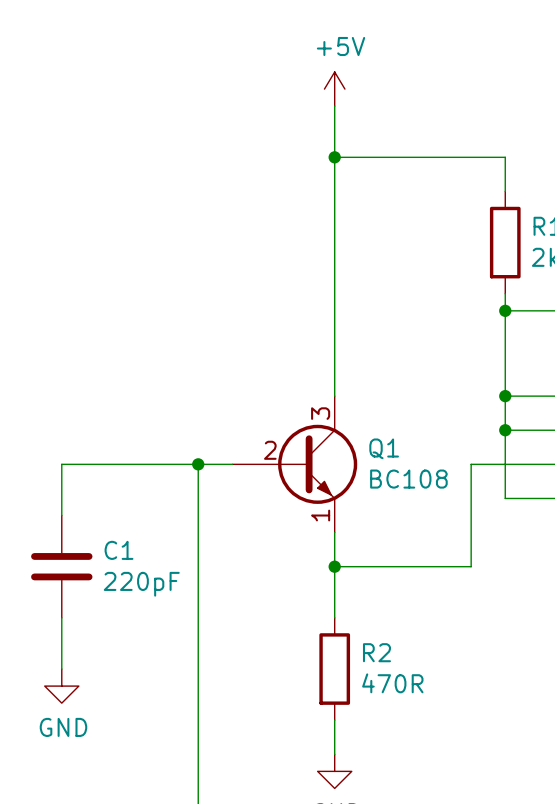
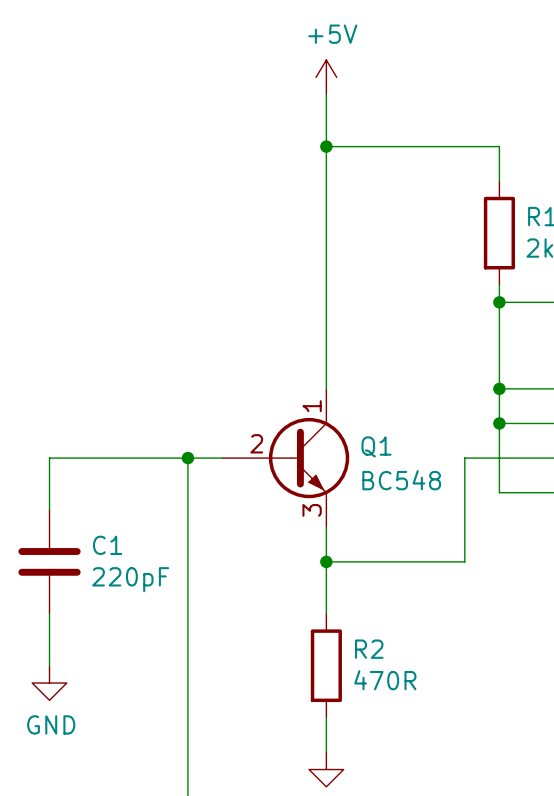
Q1 symbol: [232, 396, 358, 533] -> [222, 388, 350, 528]
Q1 value: BC108 (408, 479) -> BC548 (401, 480)

